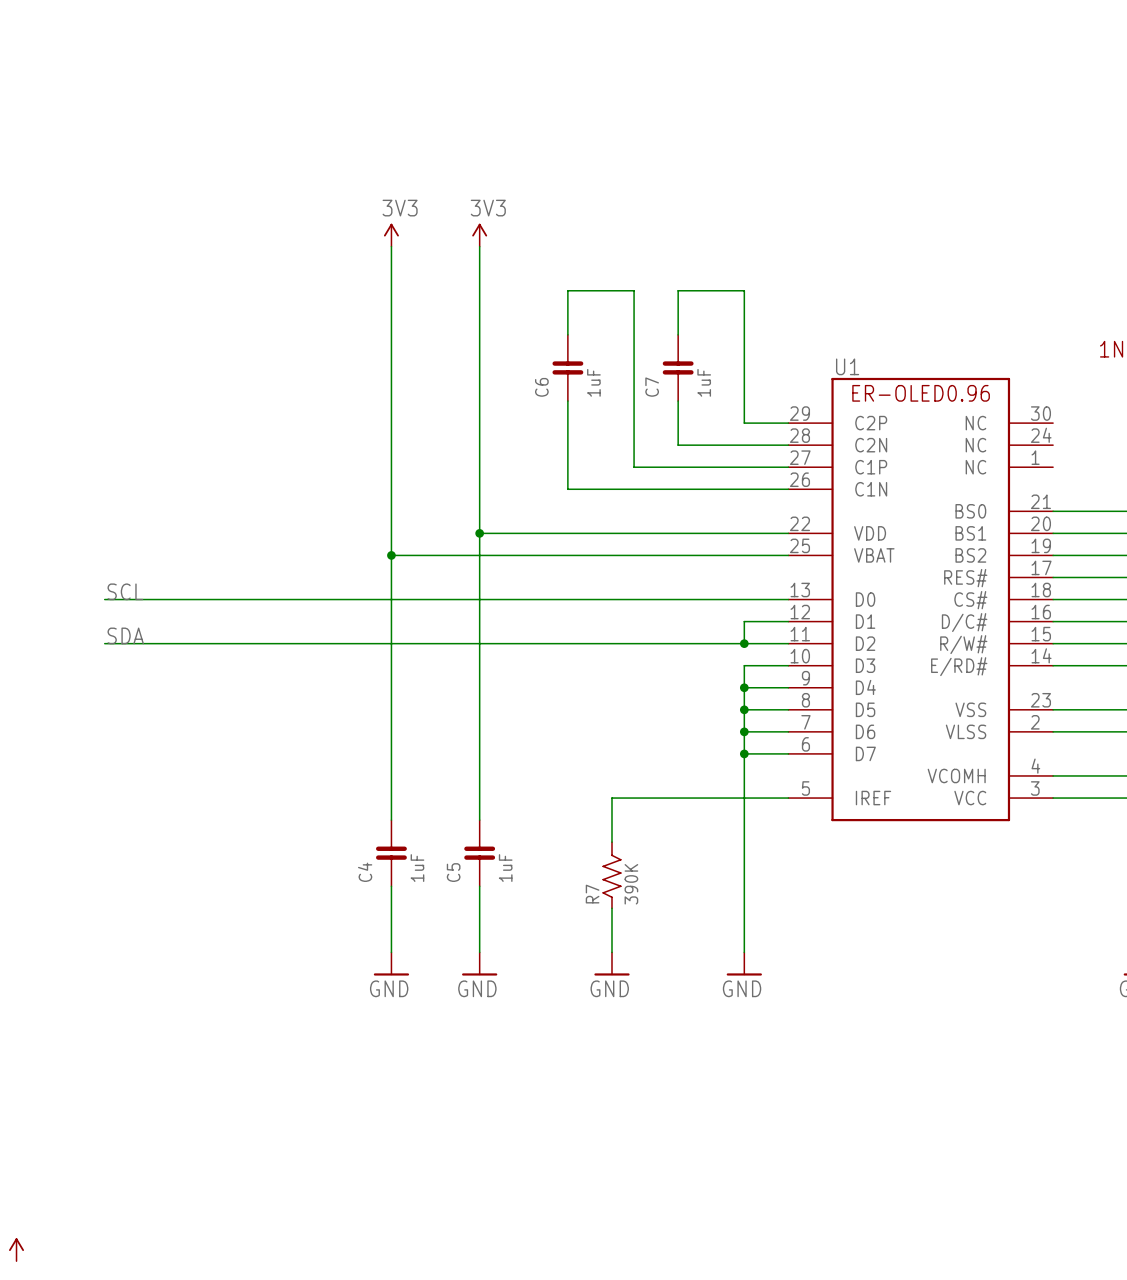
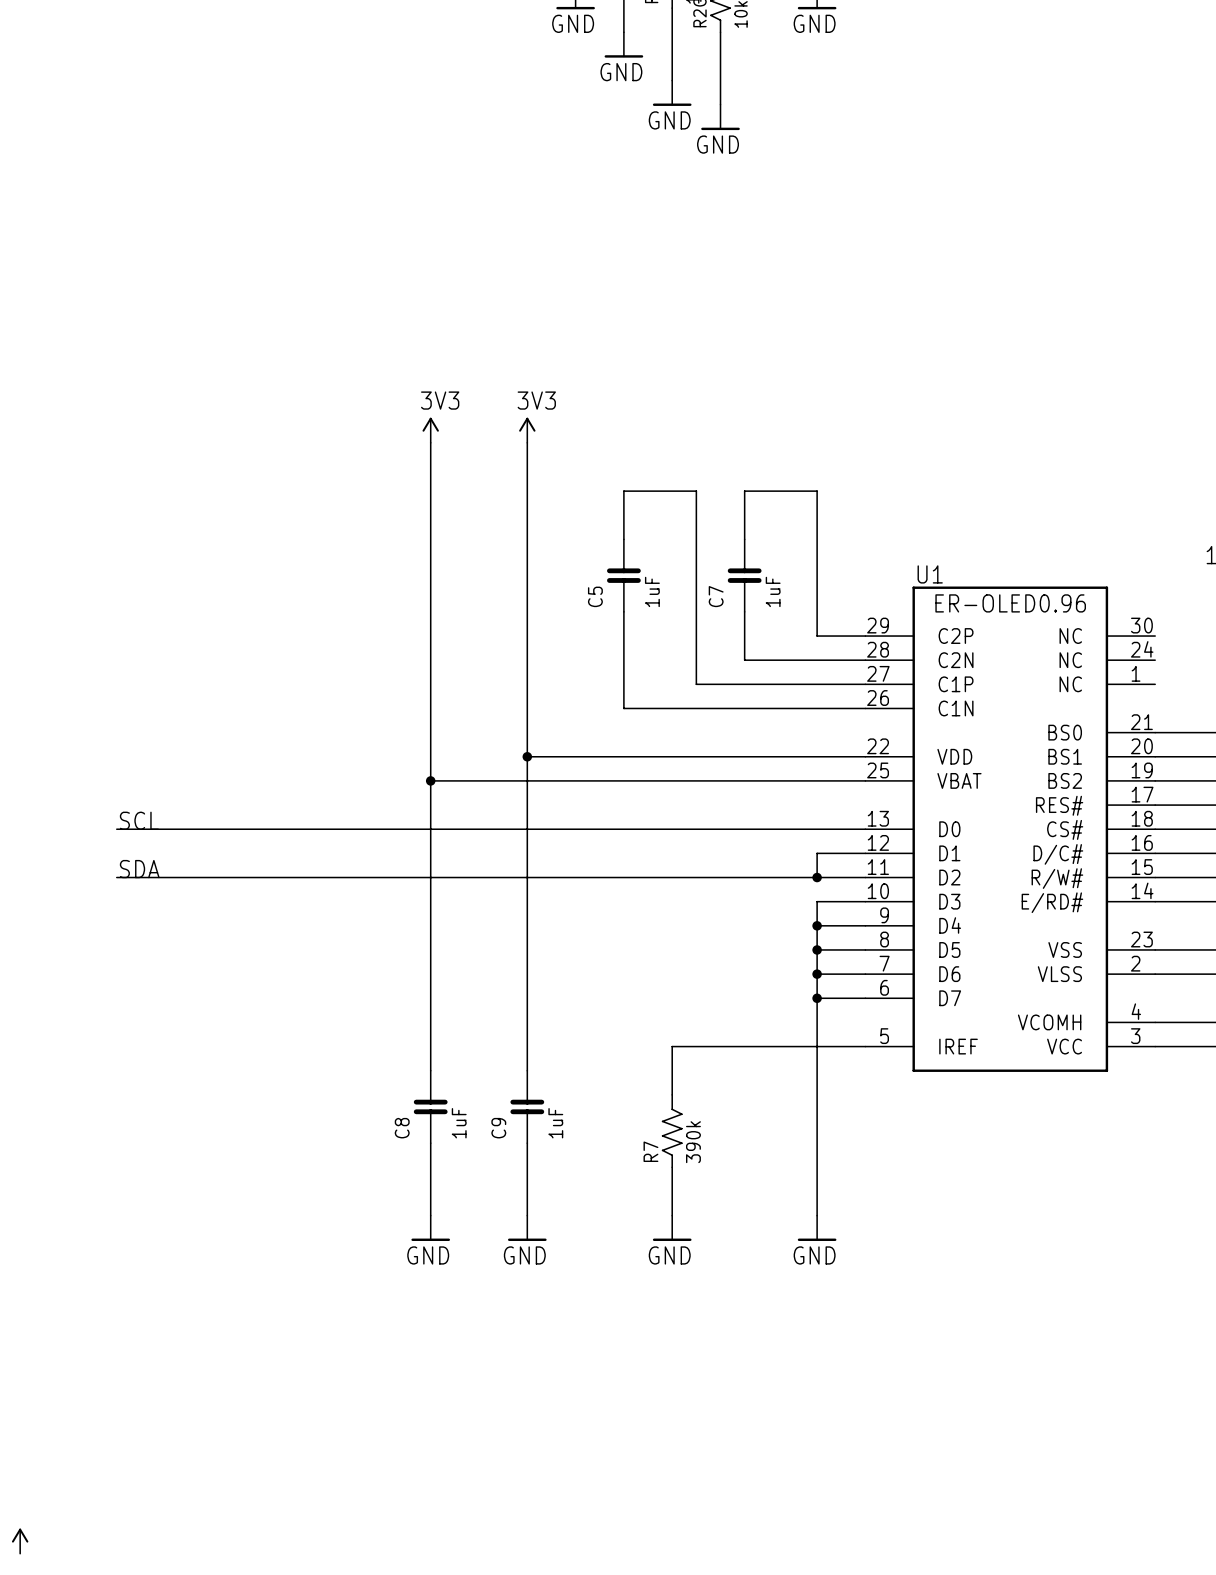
C6 name: C6 (541, 387) -> C5 (595, 596)
C4 name: C4 (365, 872) -> C8 (402, 1128)
C5 name: C5 (453, 872) -> C9 (498, 1128)
R7 value: 390K (631, 884) -> 390k (693, 1142)

